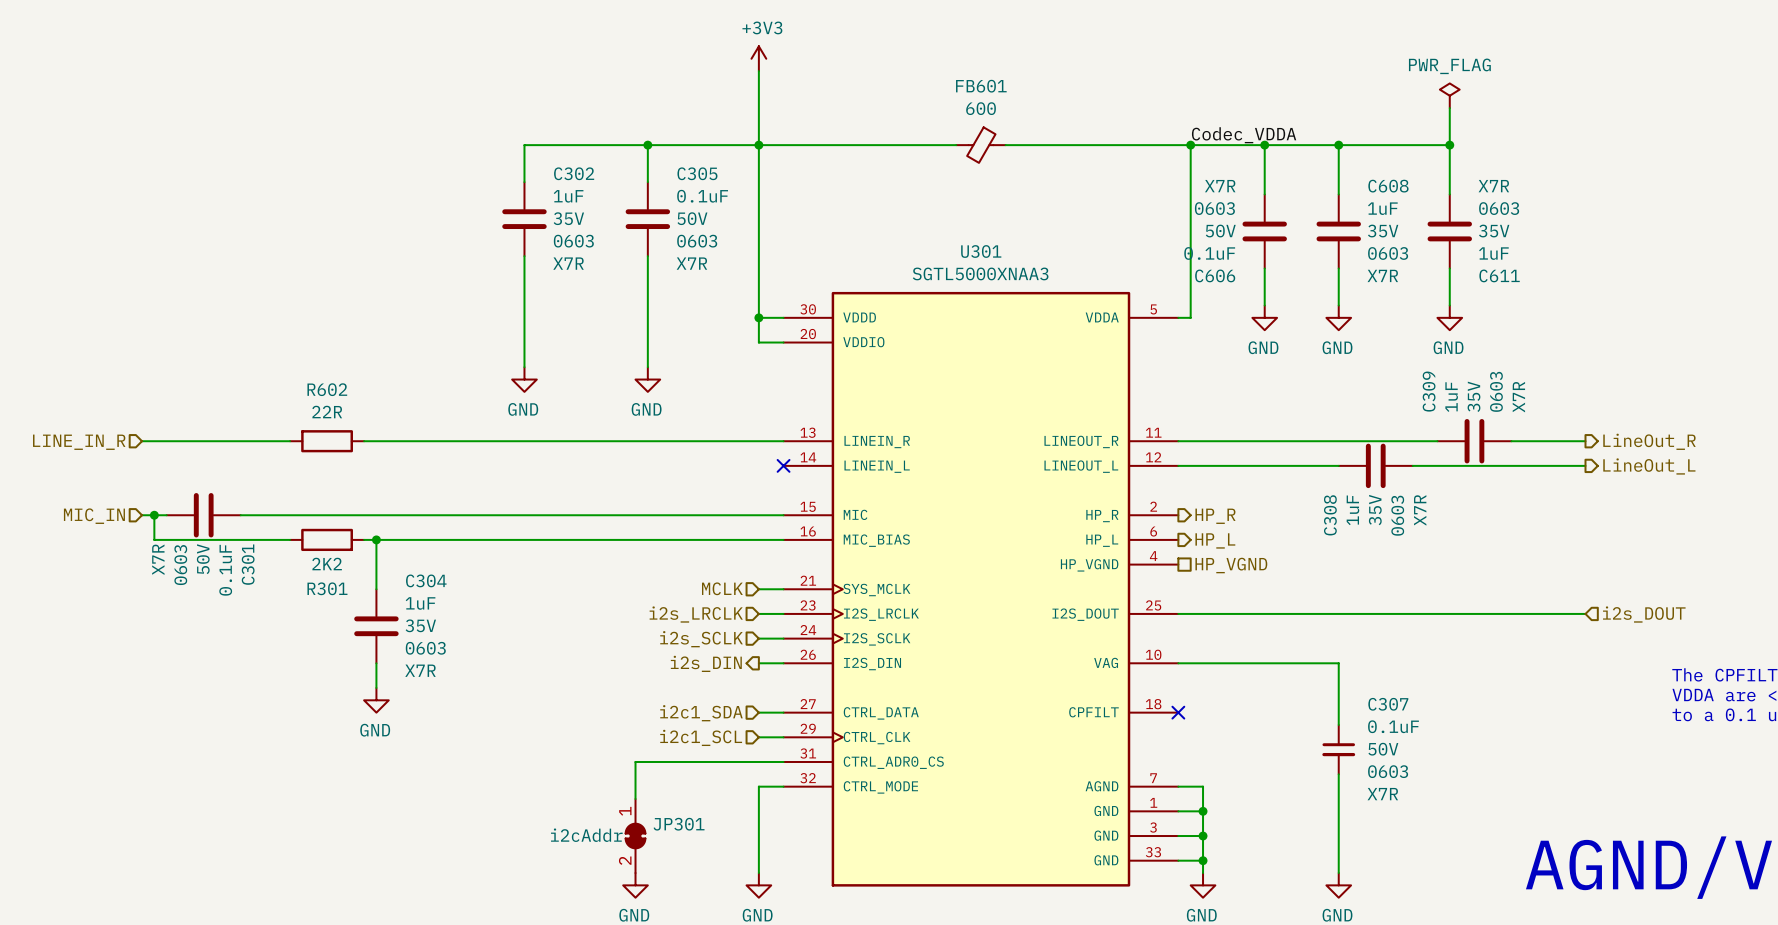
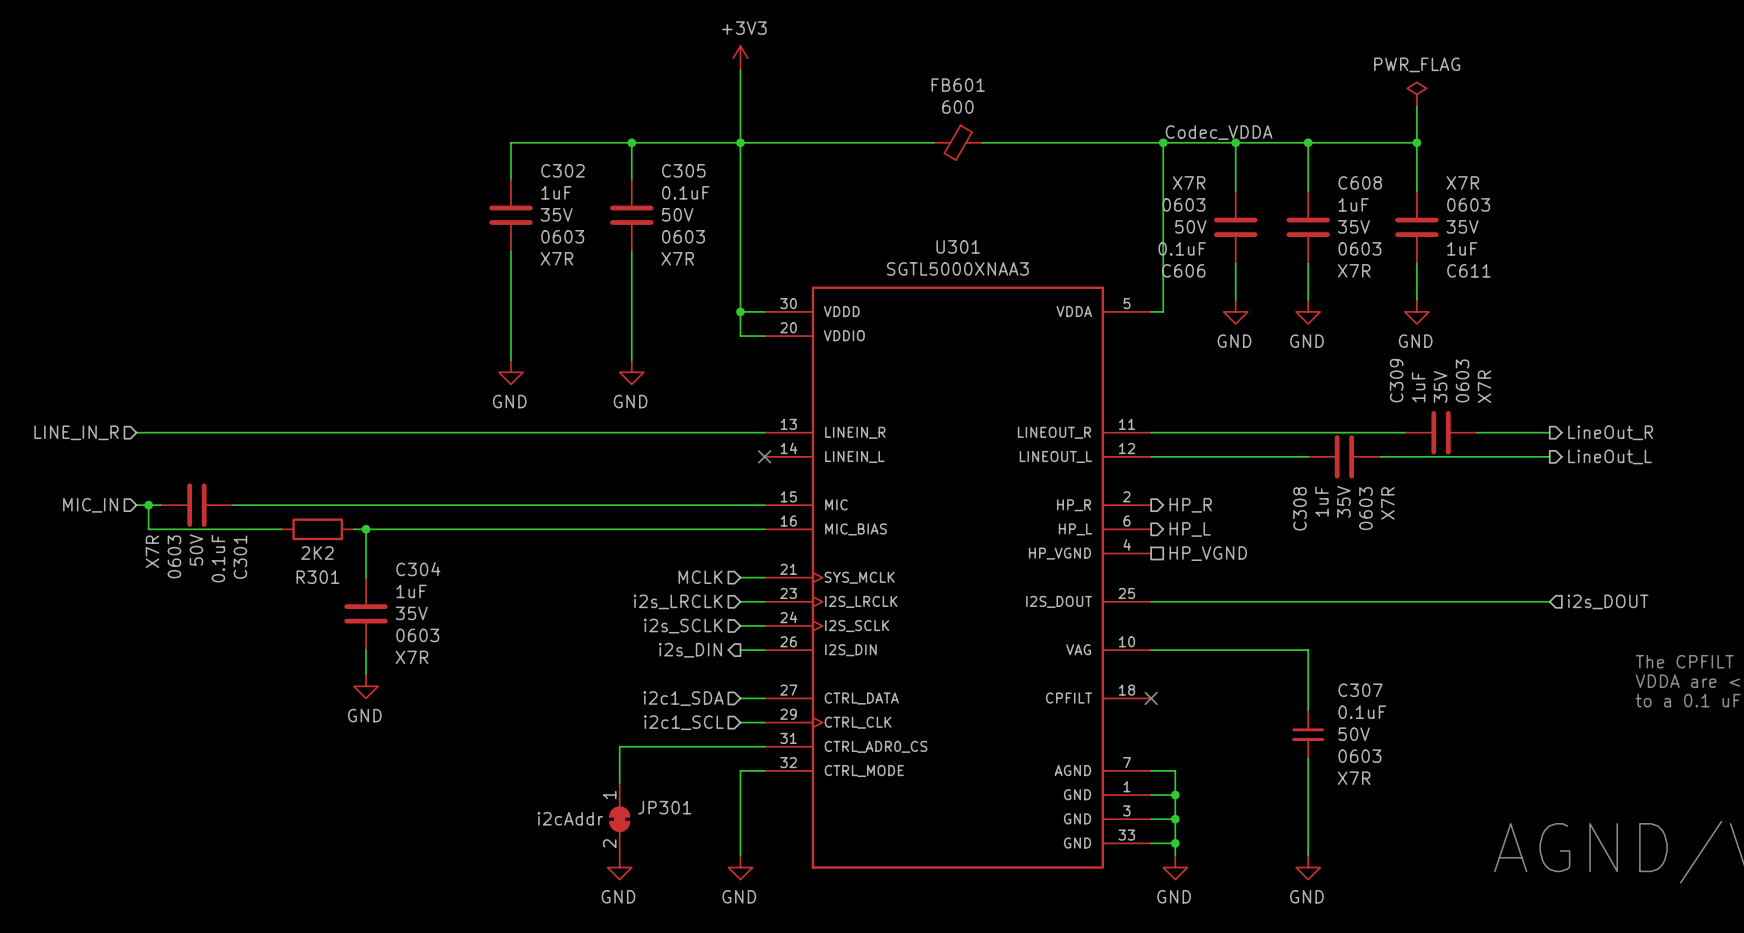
wire: none -> (281, 432) (353, 432)
R602: 22R (327, 441) -> none

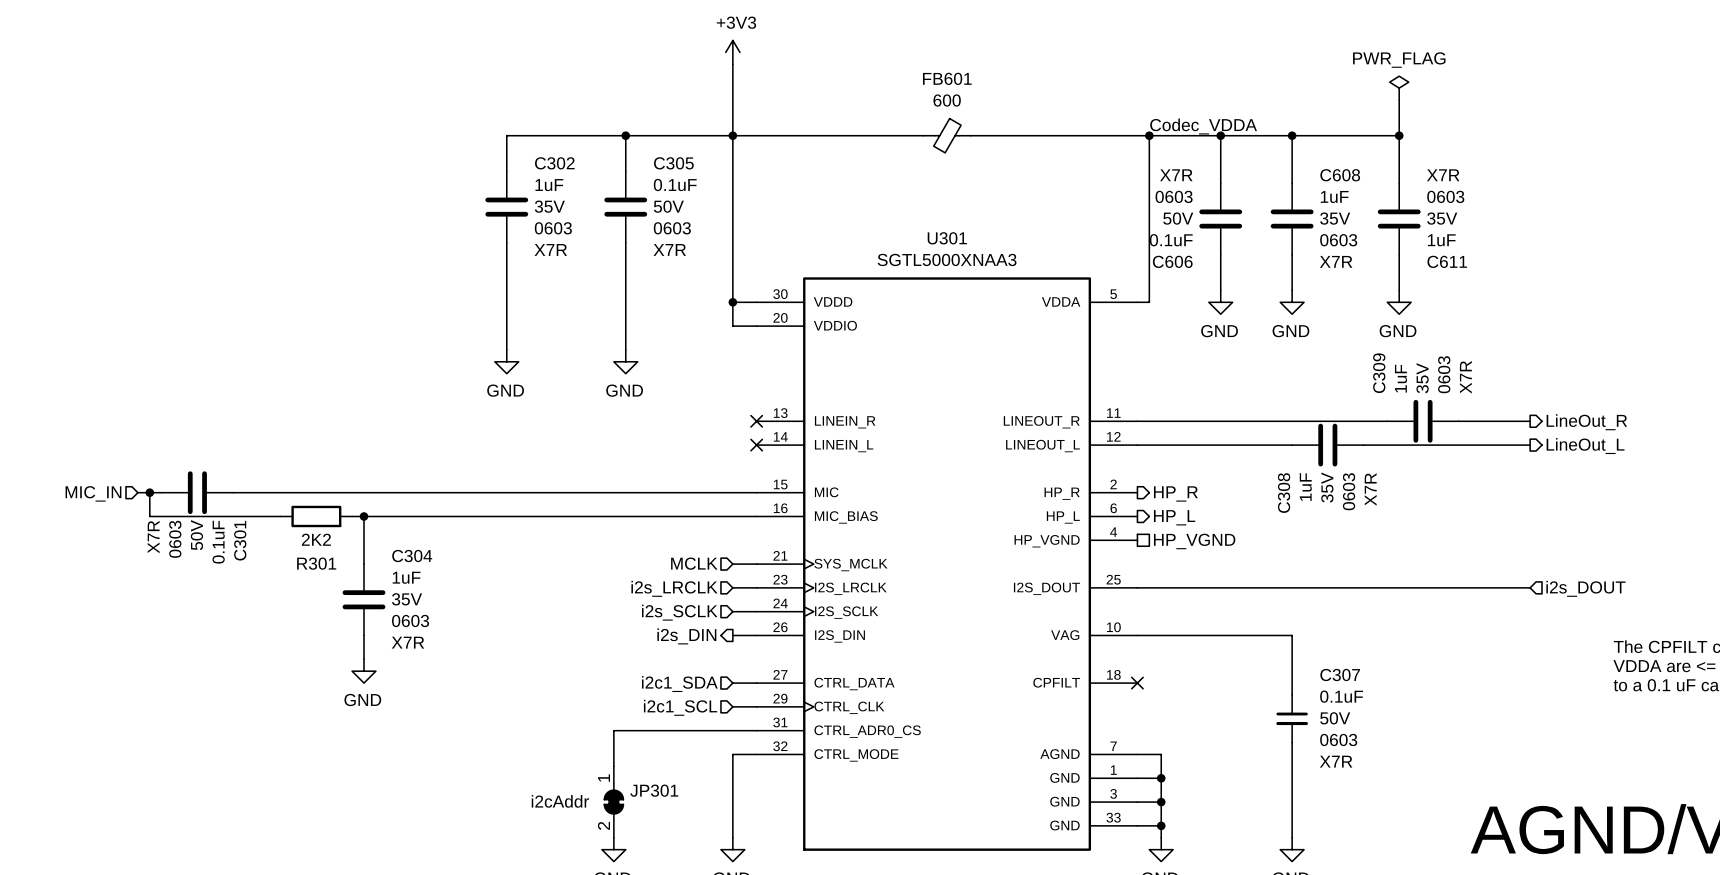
hierarchical label: LINE_IN_R (76, 432) -> none
wire: (136, 432) (764, 432) -> none
no-connect mark: none -> (756, 421)

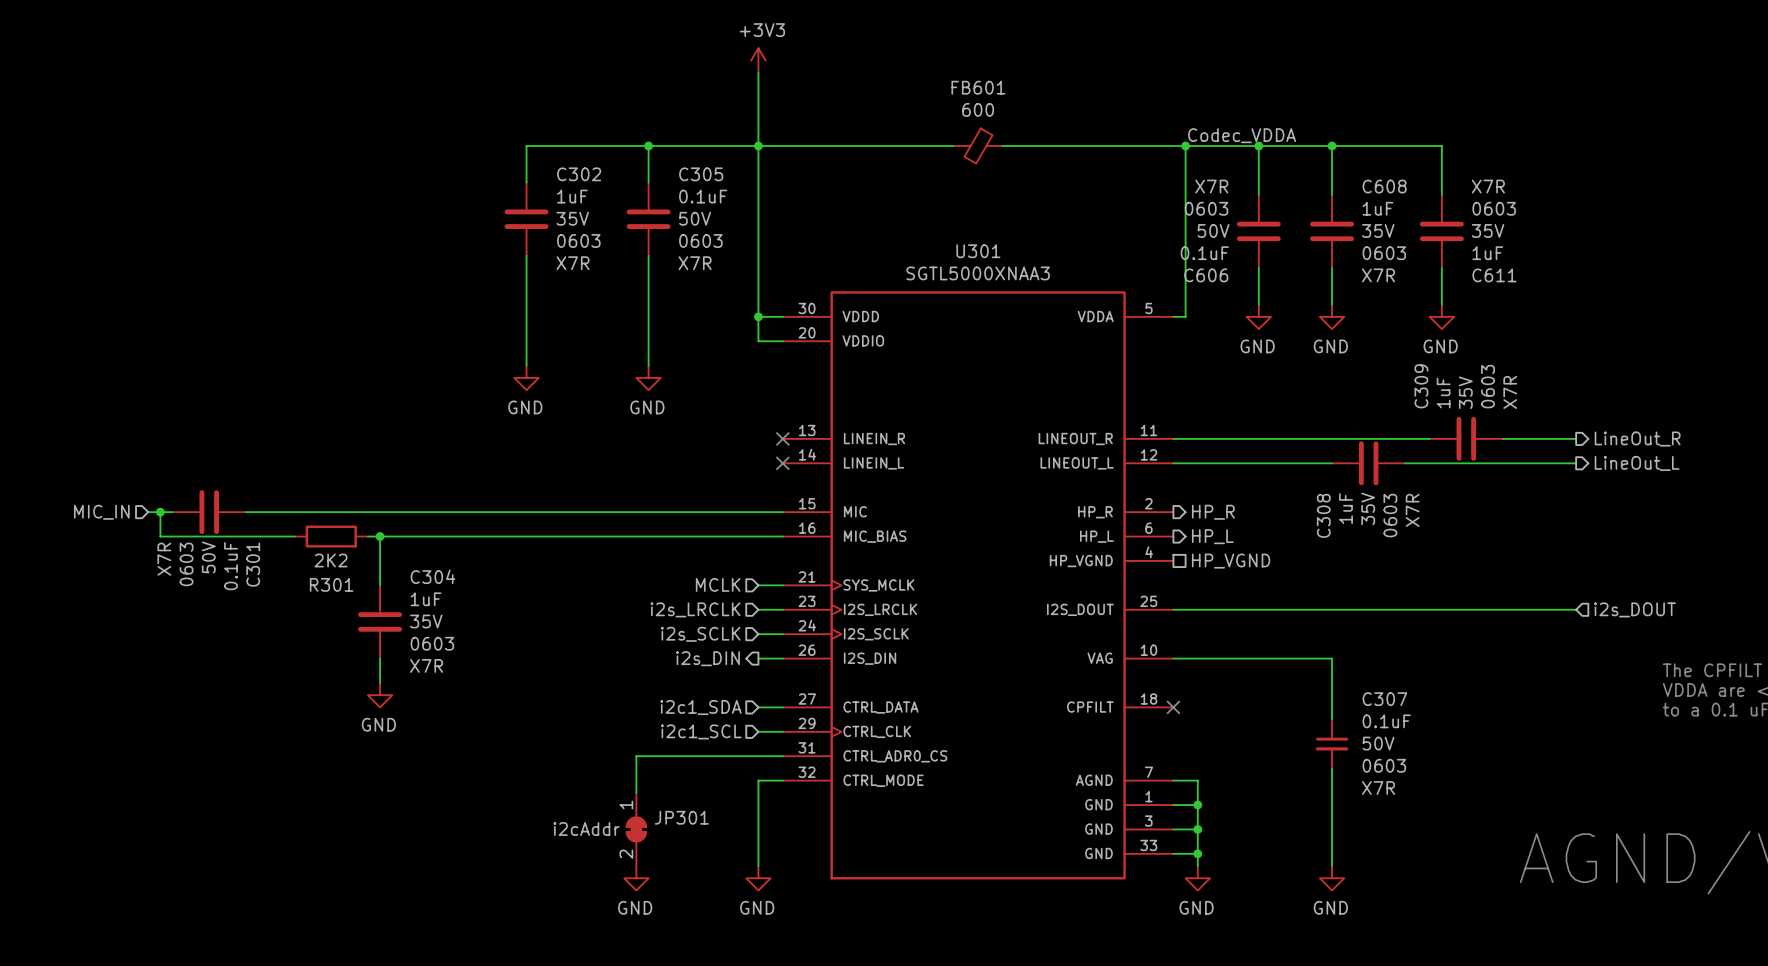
power symbol: PWR_FLAG (1399, 88) -> none
wire: (1399, 100) (1399, 135) -> none
junction: (1399, 135) -> none

